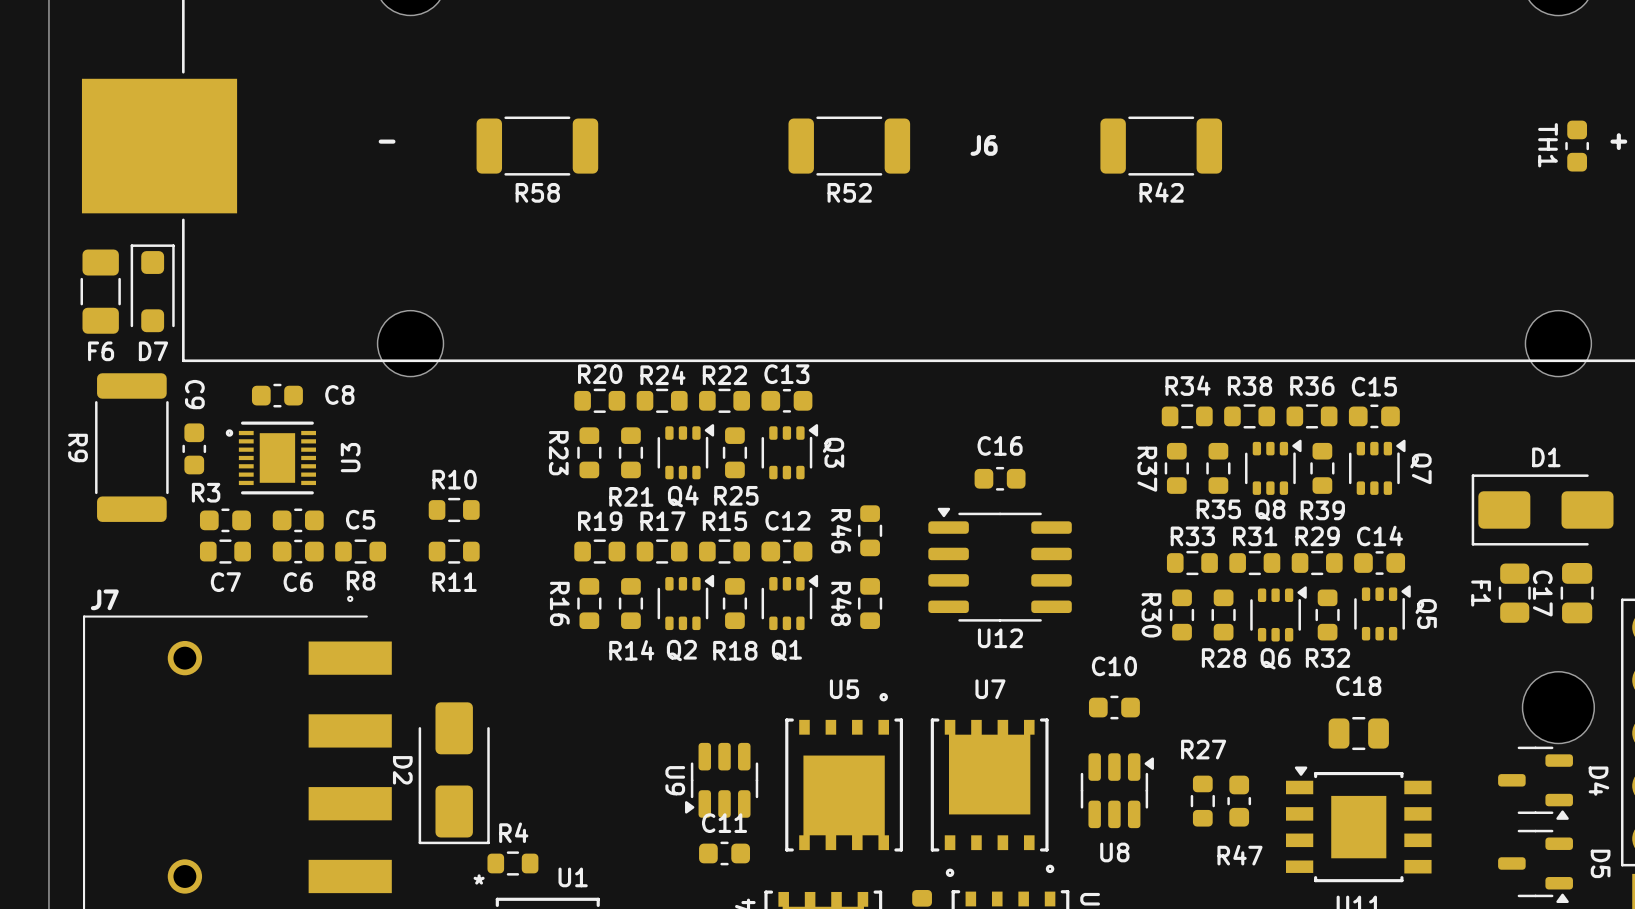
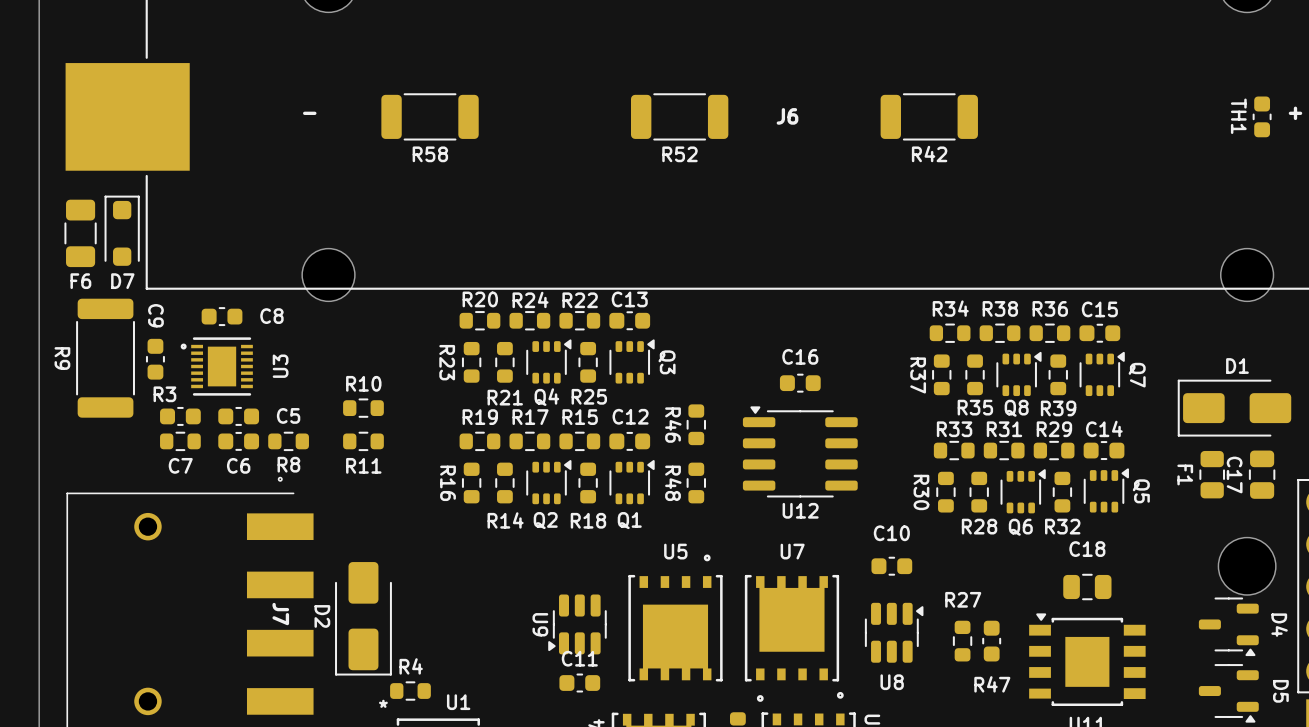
J7 name rotation: 0° (104, 599) -> 90° clockwise (280, 614)
J7 name position: J7 (104, 599) -> J7 (280, 614)

